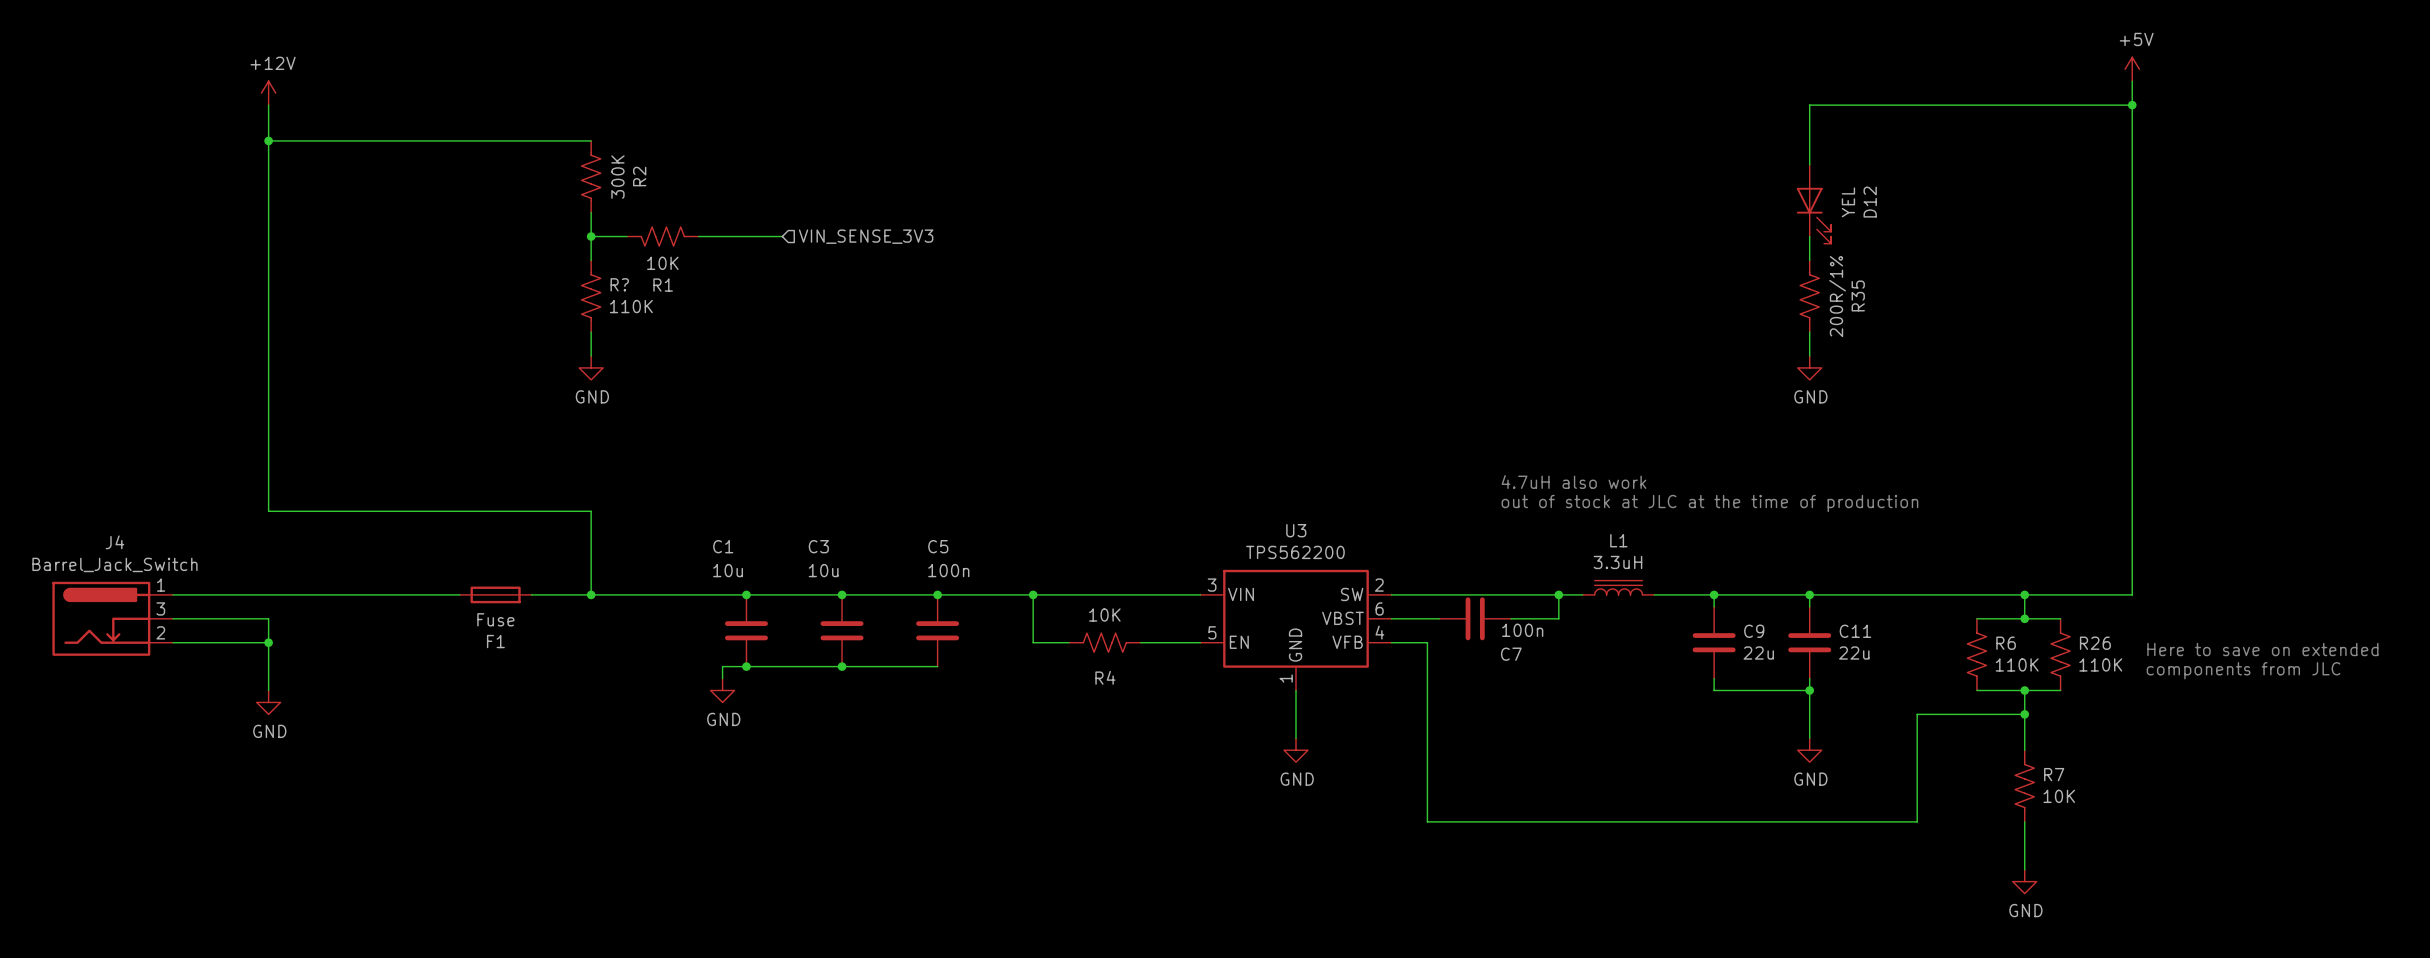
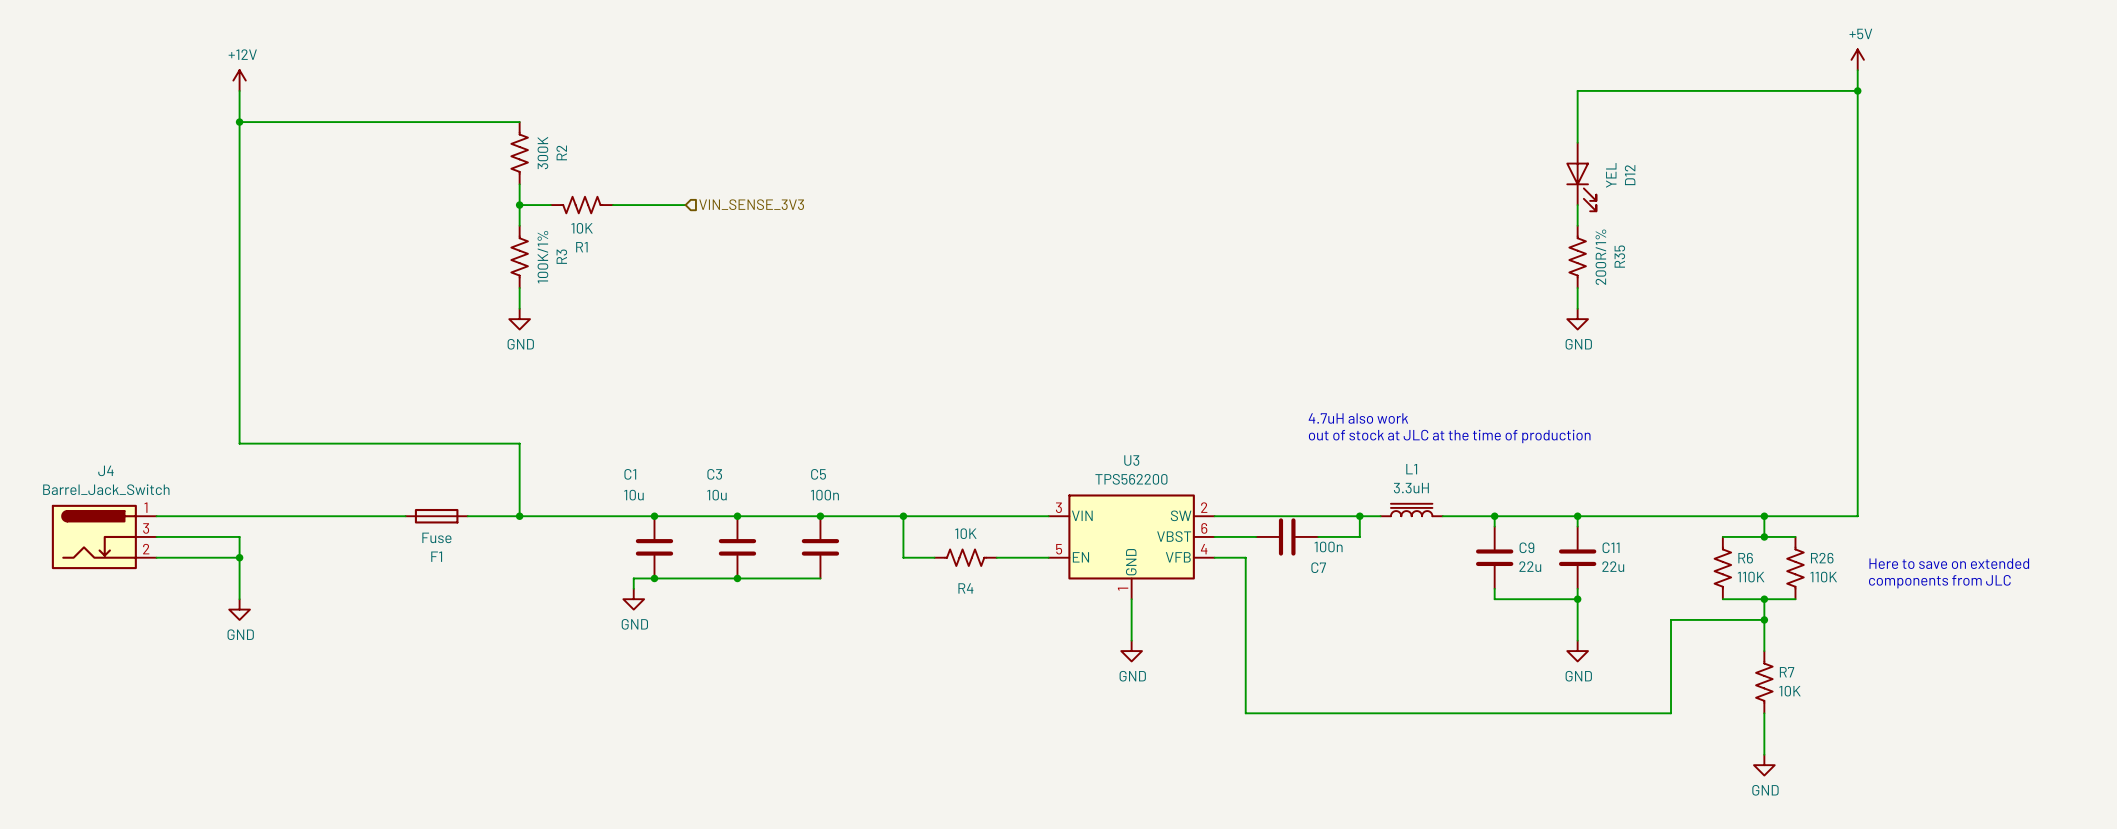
R? name: R? (619, 284) -> R3 (561, 256)
R? value: 110K (631, 306) -> 100K/1% (542, 257)

